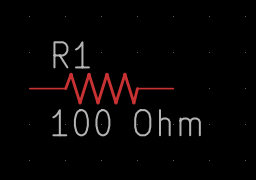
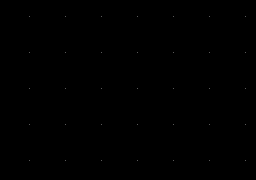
R1: 100 Ohm (101, 88) -> none

